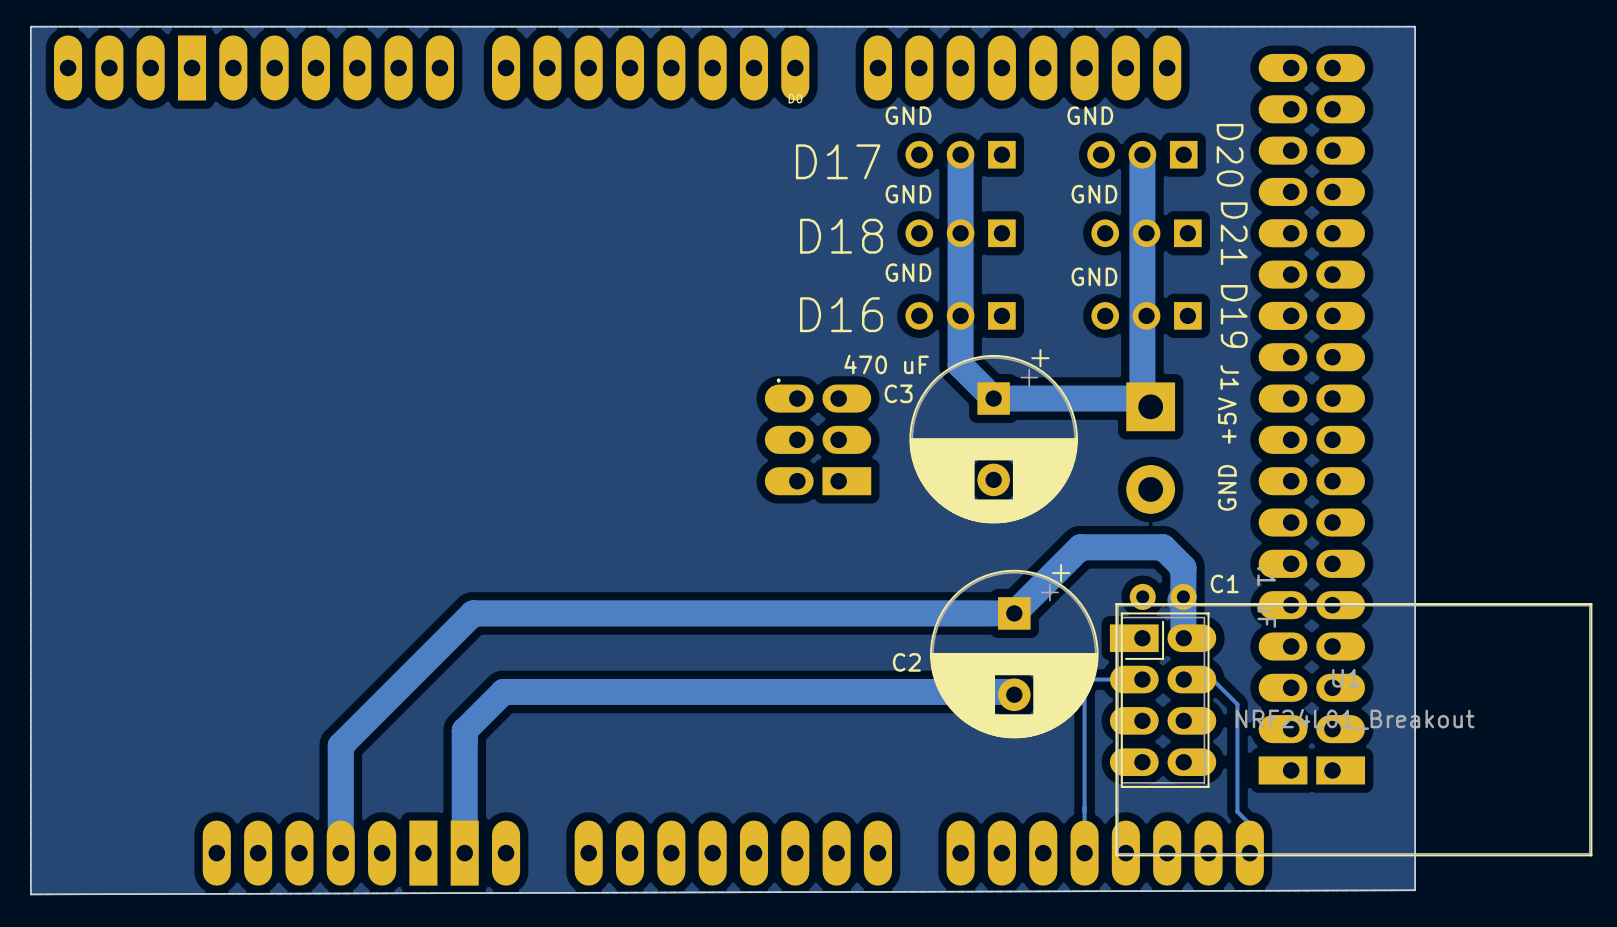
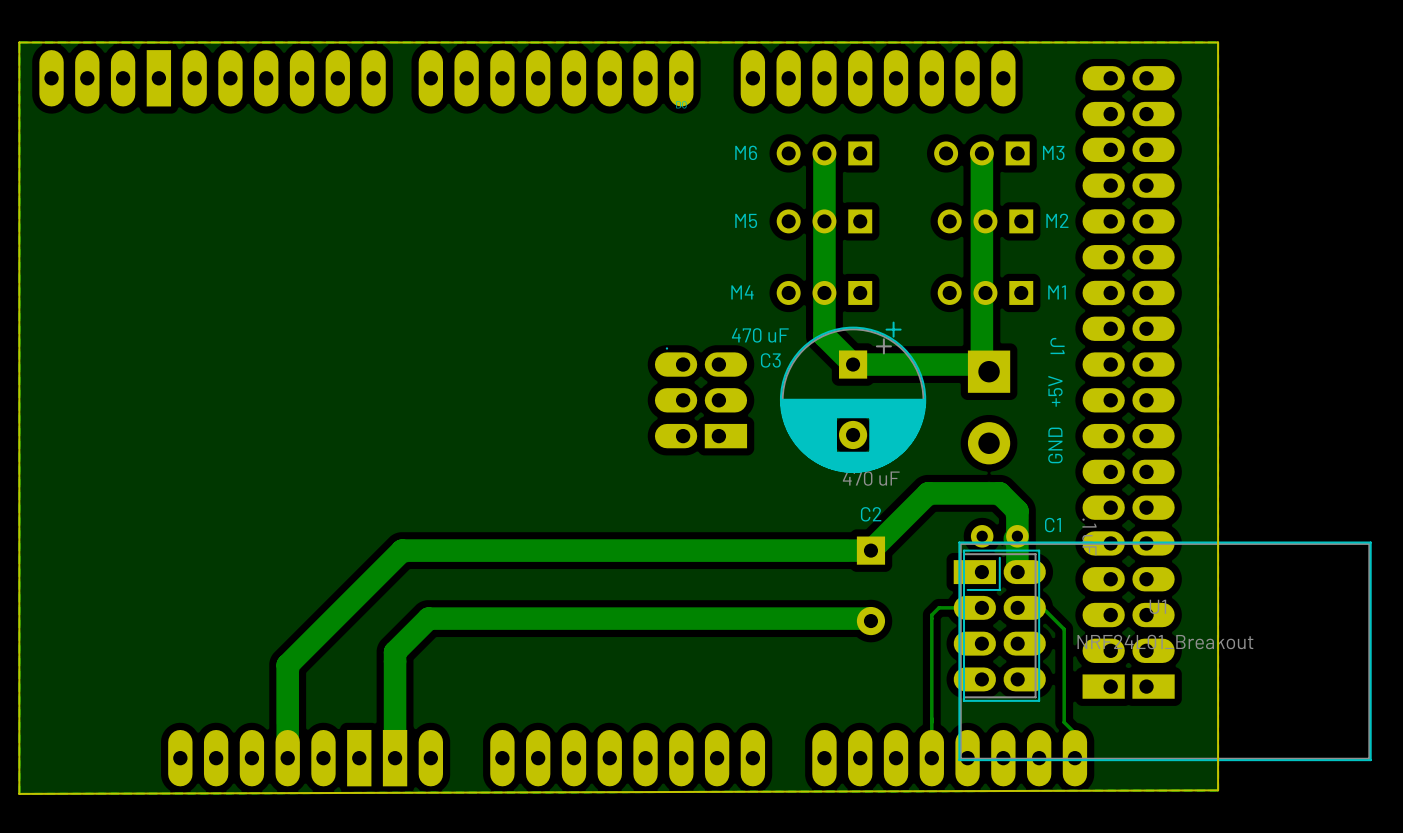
text: GND (908, 115) -> none
text: GND (1090, 115) -> none
M3 name: none -> M3 (1053, 152)
M3 text: D20 (1230, 155) -> none
D17 name: D17 (838, 161) -> M6 (746, 152)
text: GND (908, 194) -> none
text: GND (1094, 194) -> none
D21 name: D21 (1234, 233) -> M2 (1057, 220)
D18 name: D18 (841, 236) -> M5 (746, 220)
text: GND (908, 272) -> none
text: GND (1094, 276) -> none
D16 name: D16 (841, 314) -> M4 (742, 292)
D19 name: D19 (1234, 316) -> M1 (1057, 292)
C2 side: bottom (1014, 651) -> top (870, 585)

